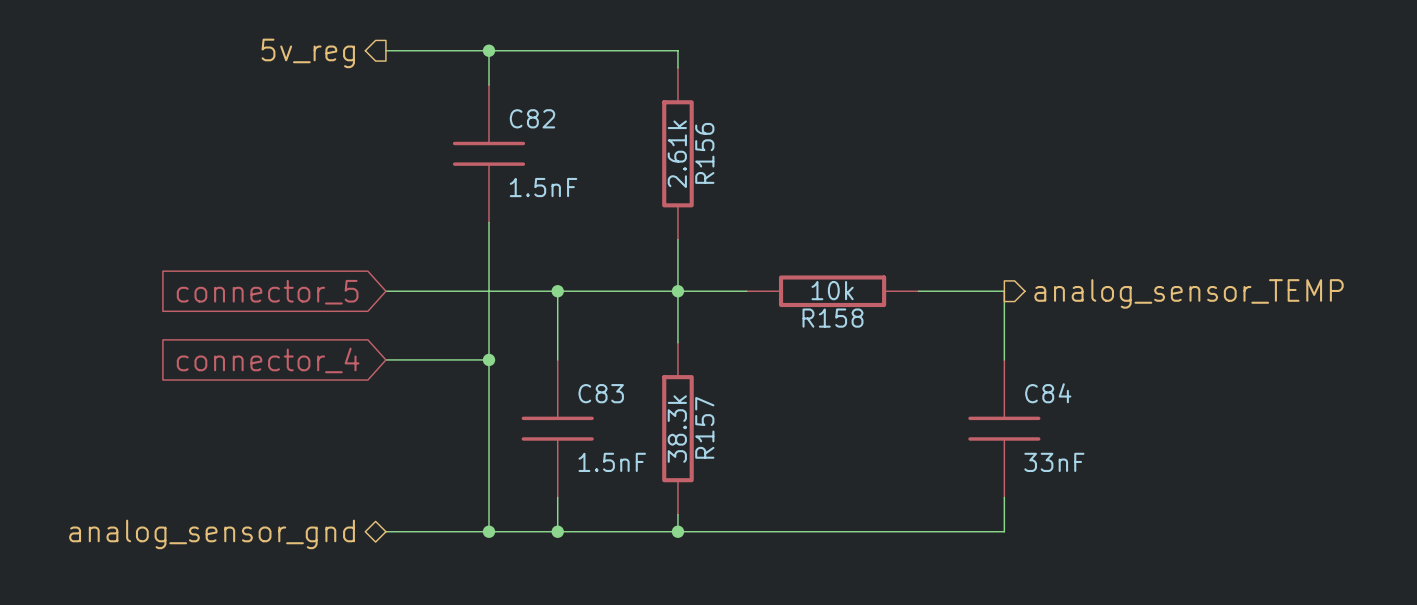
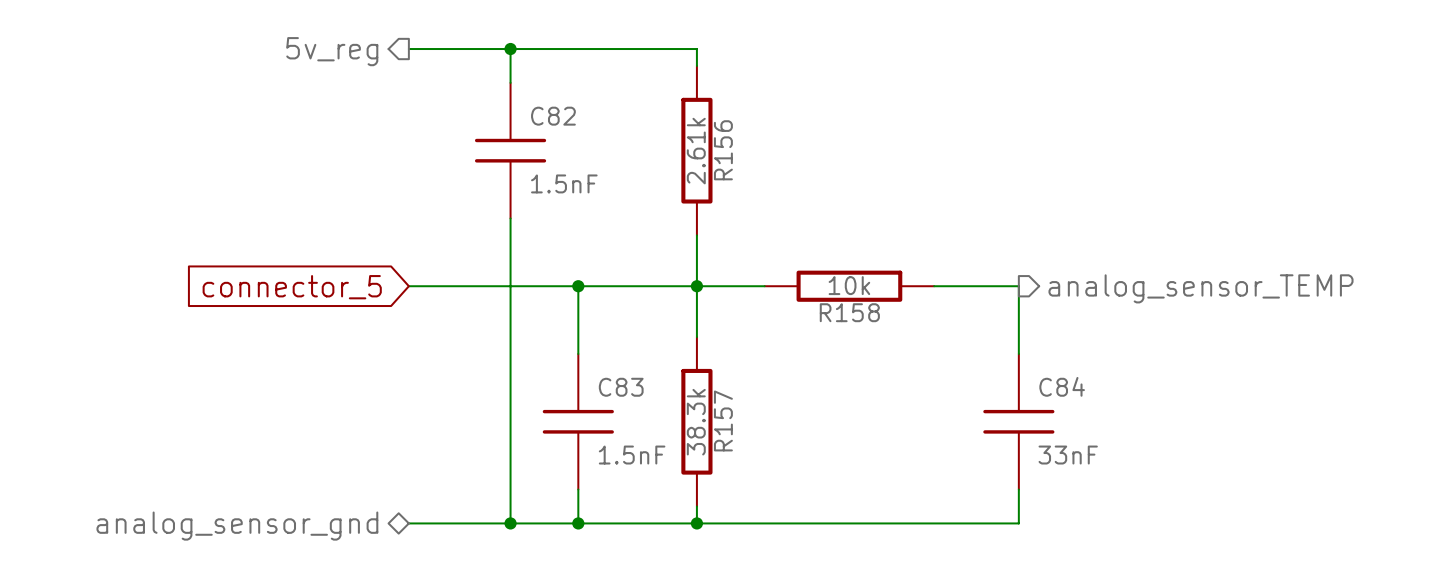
wire: (385, 359) (489, 359) -> none
junction: (489, 359) -> none
global label: connector_4 (268, 360) -> none

